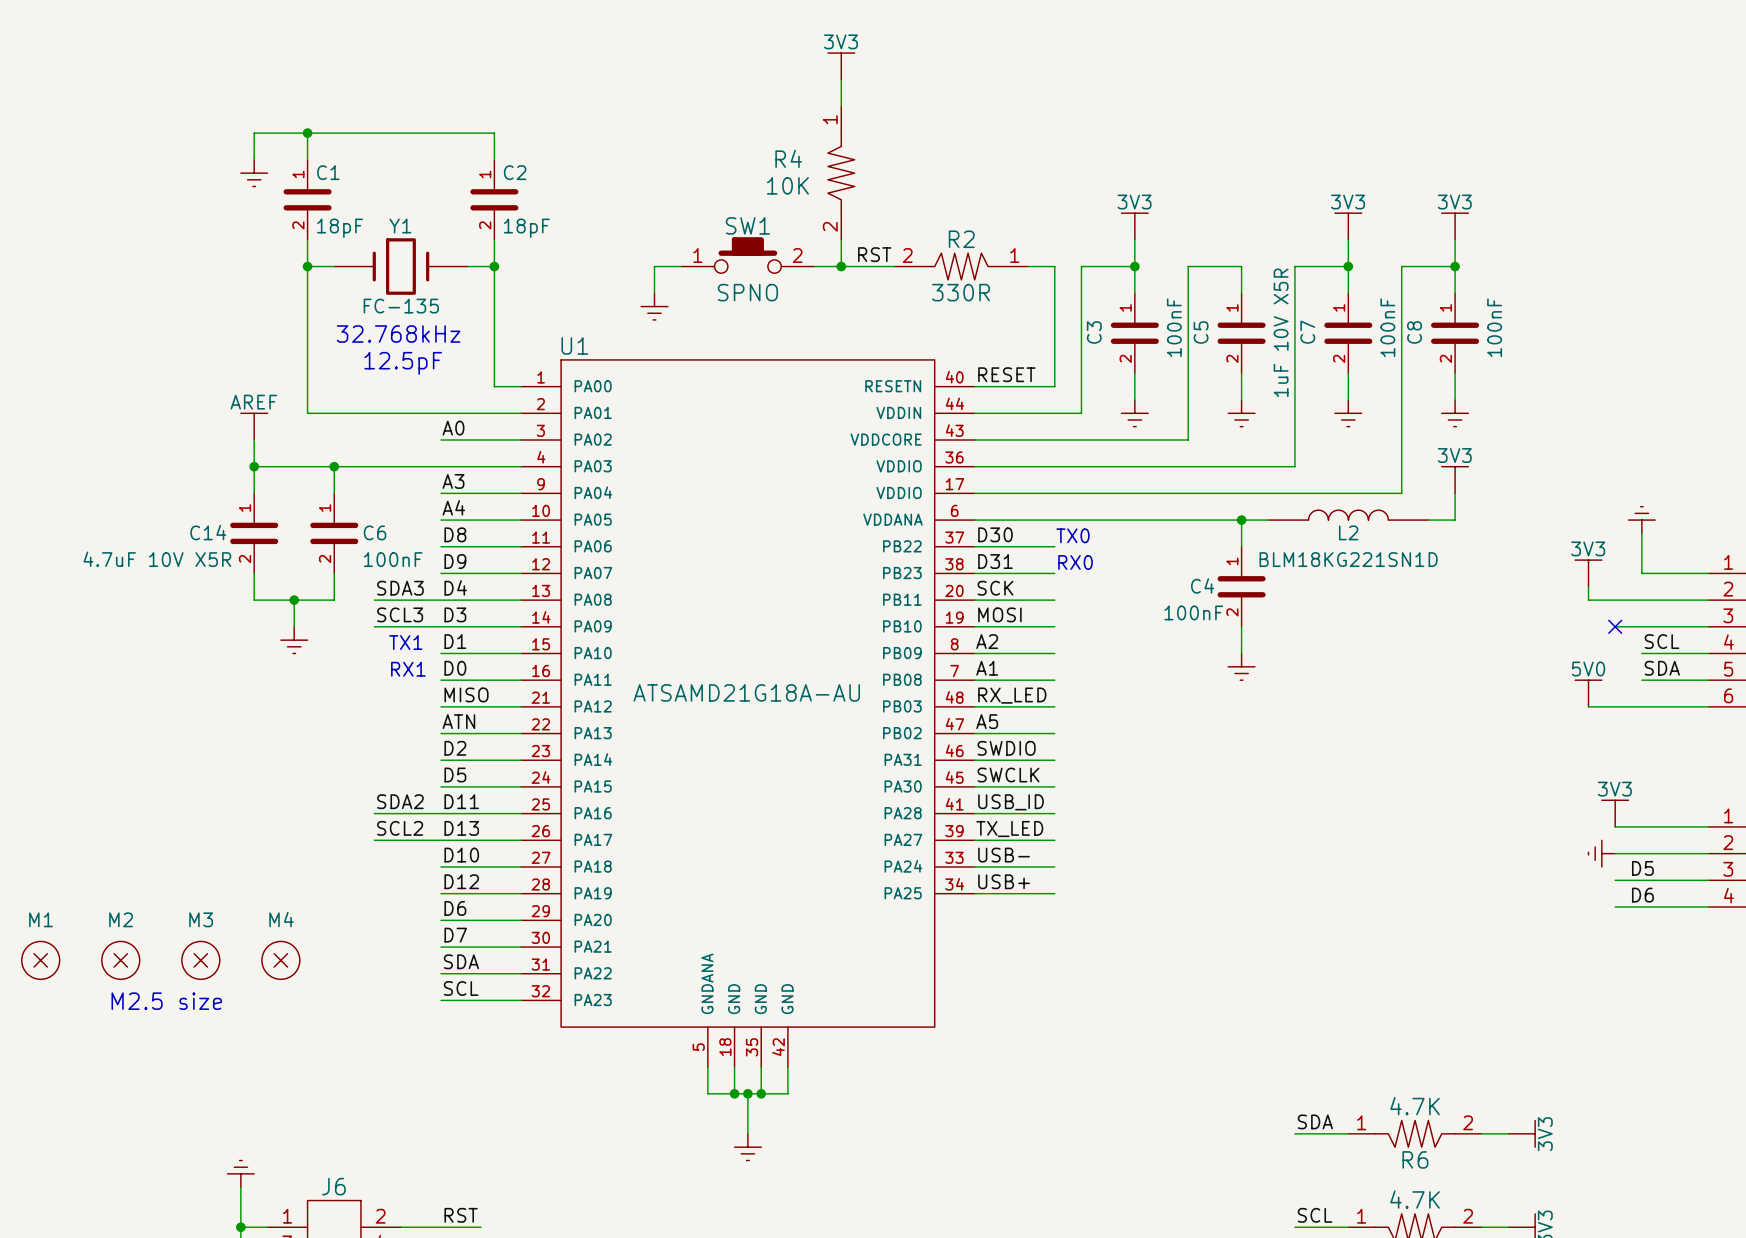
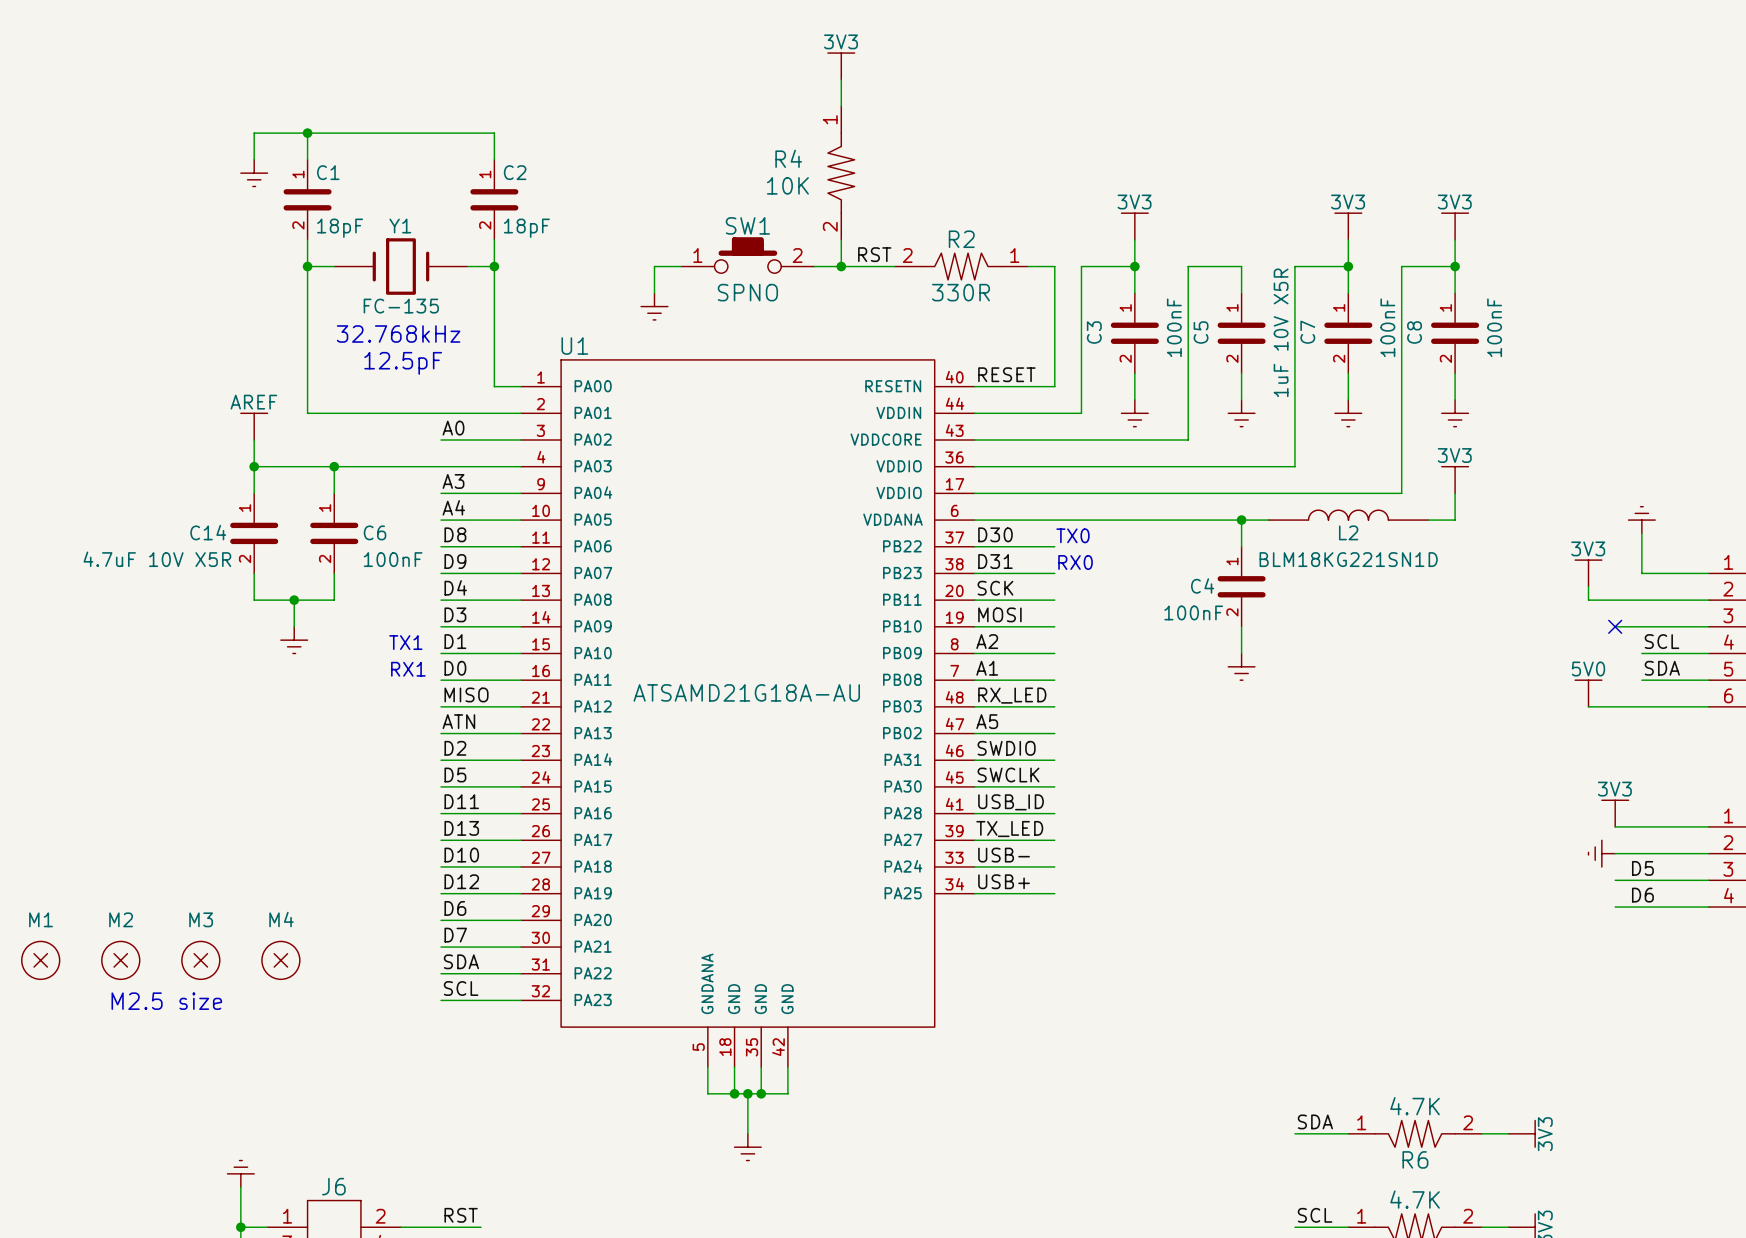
label: SDA3 (400, 588) -> none
wire: (374, 600) (441, 600) -> none
label: SCL3 (400, 614) -> none
wire: (374, 626) (441, 626) -> none
label: SDA2 (400, 801) -> none
wire: (374, 813) (441, 813) -> none
label: SCL2 (400, 828) -> none
wire: (374, 840) (441, 840) -> none

